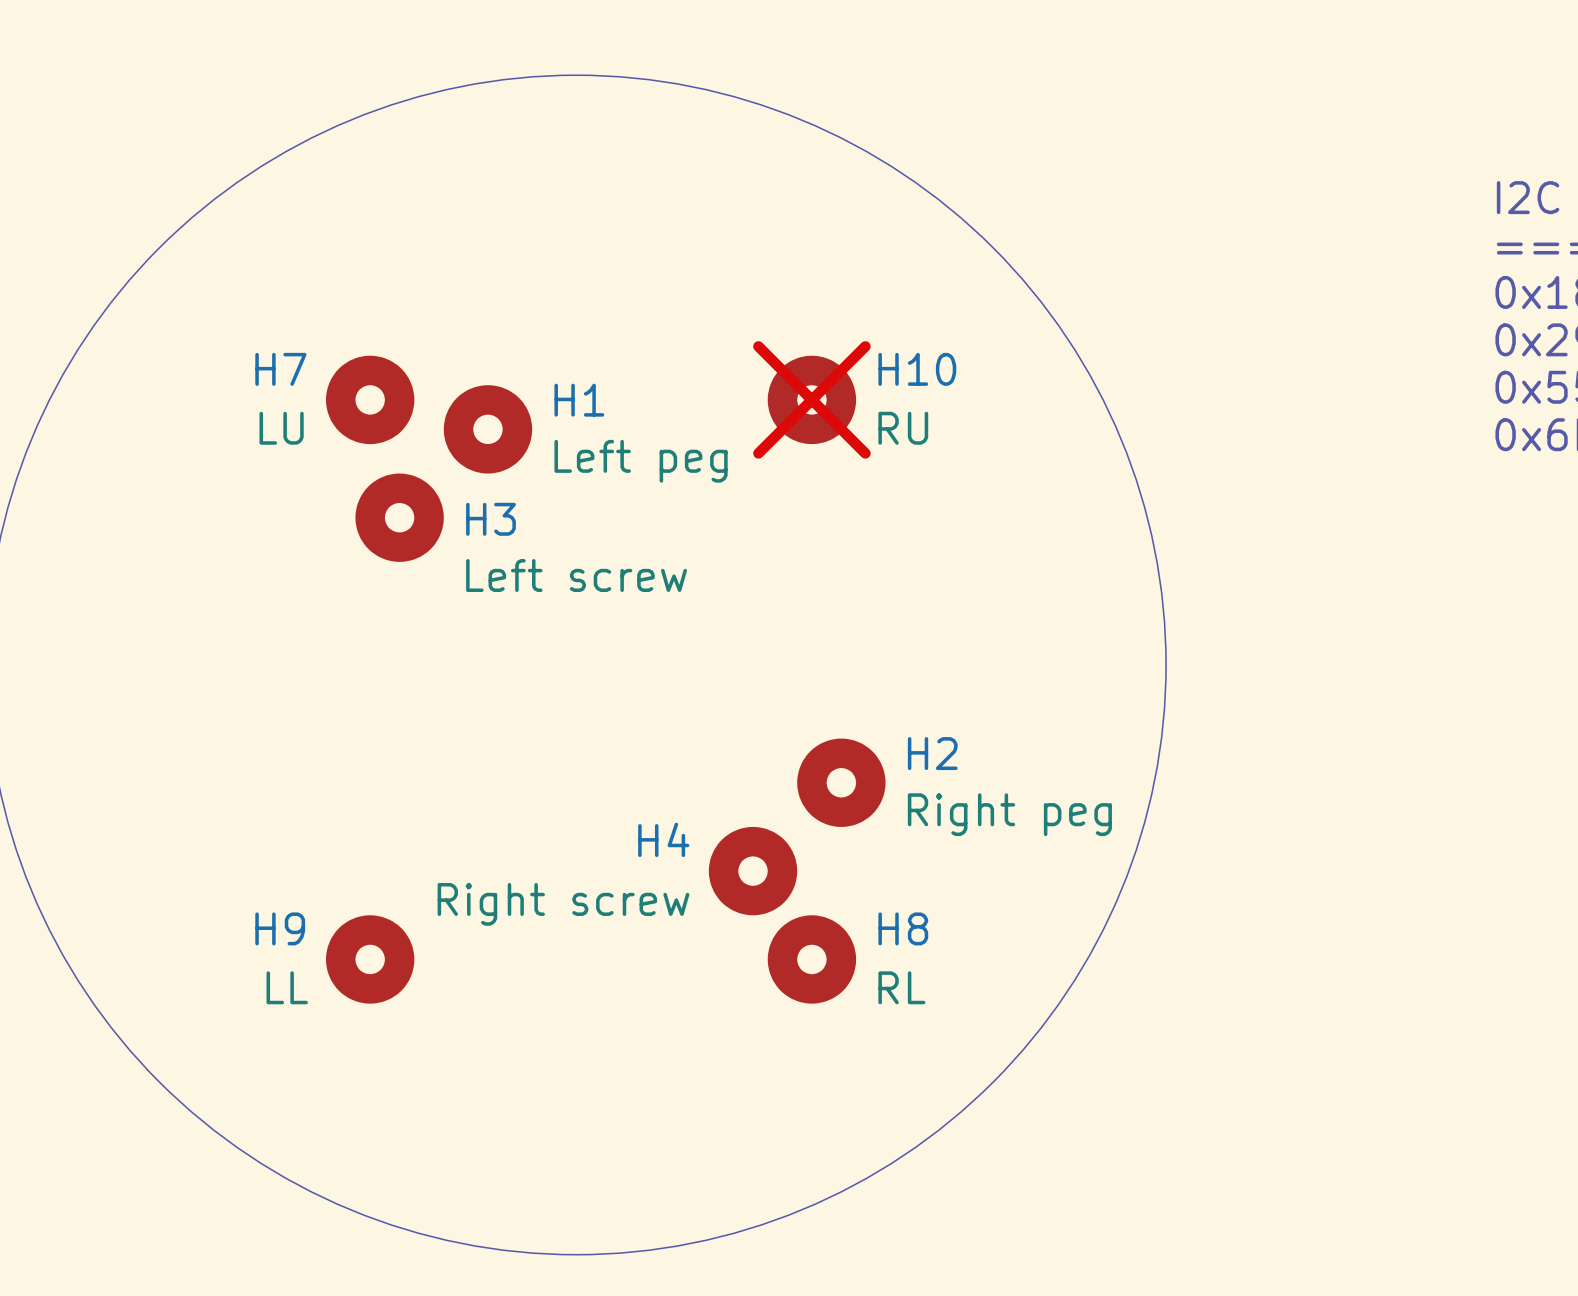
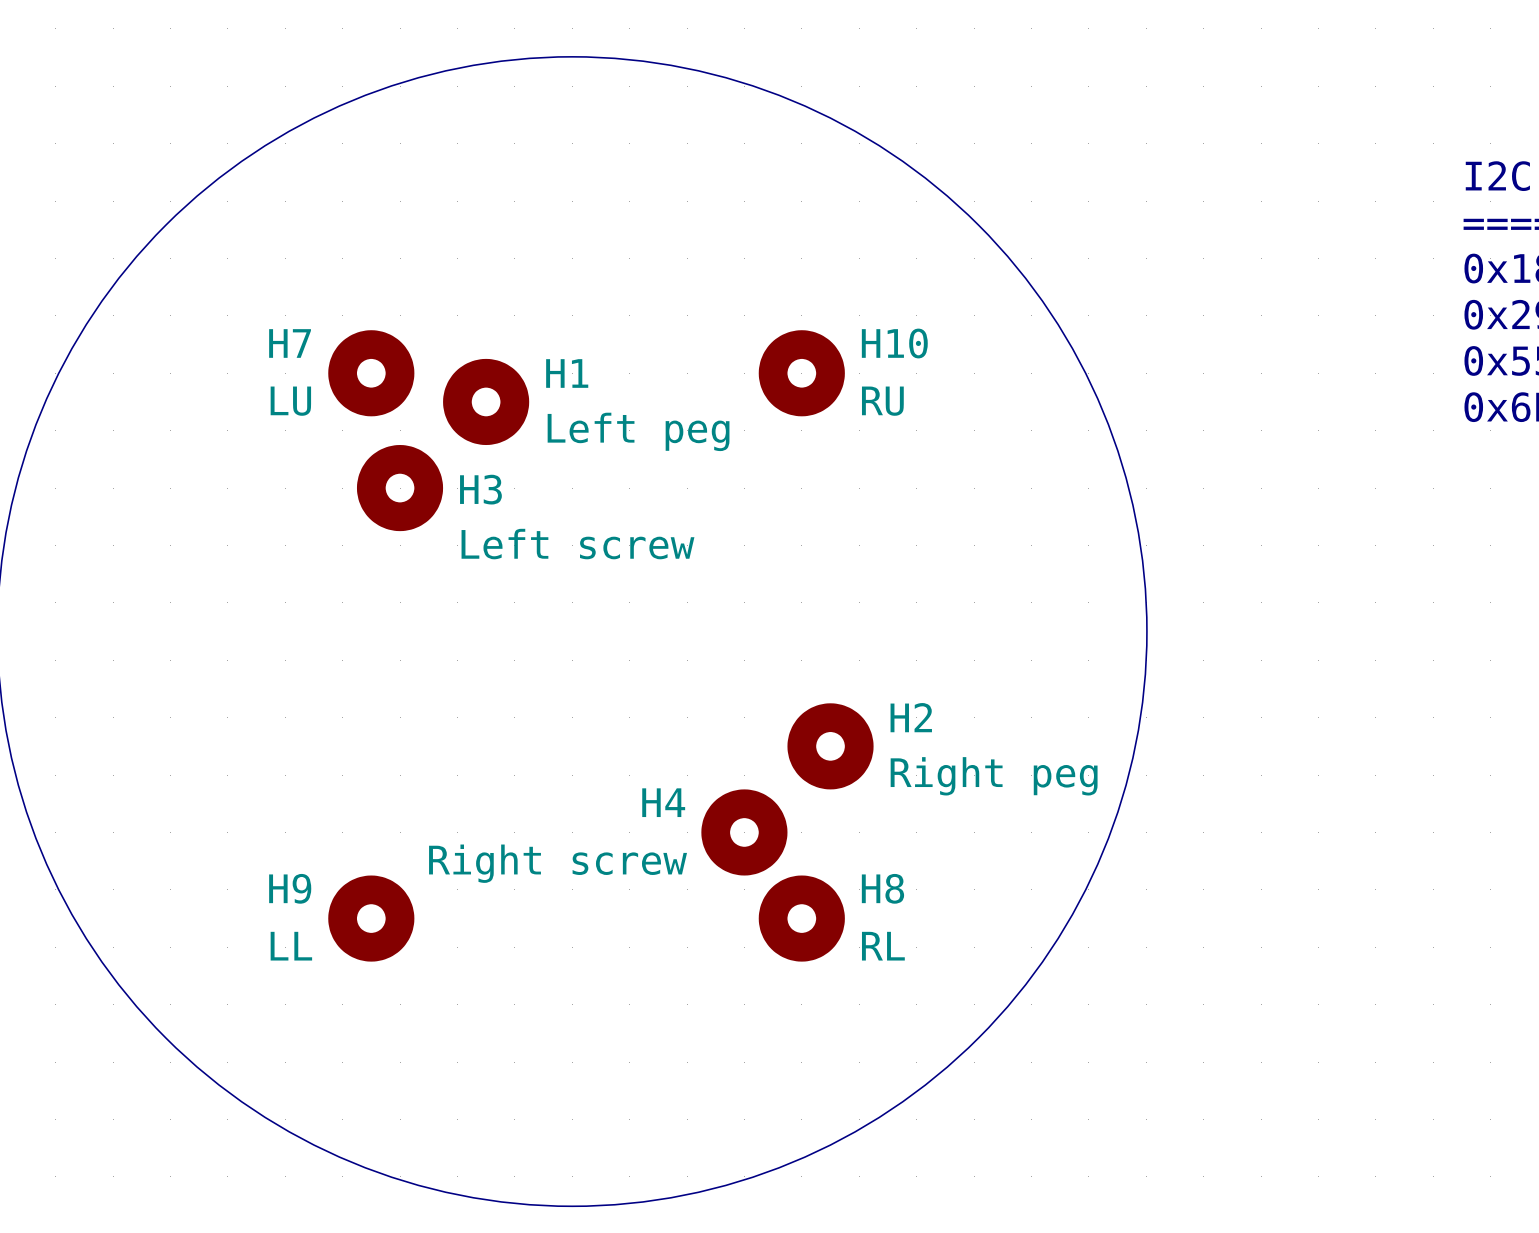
H10 do-not-place cross: (811, 399) -> none

